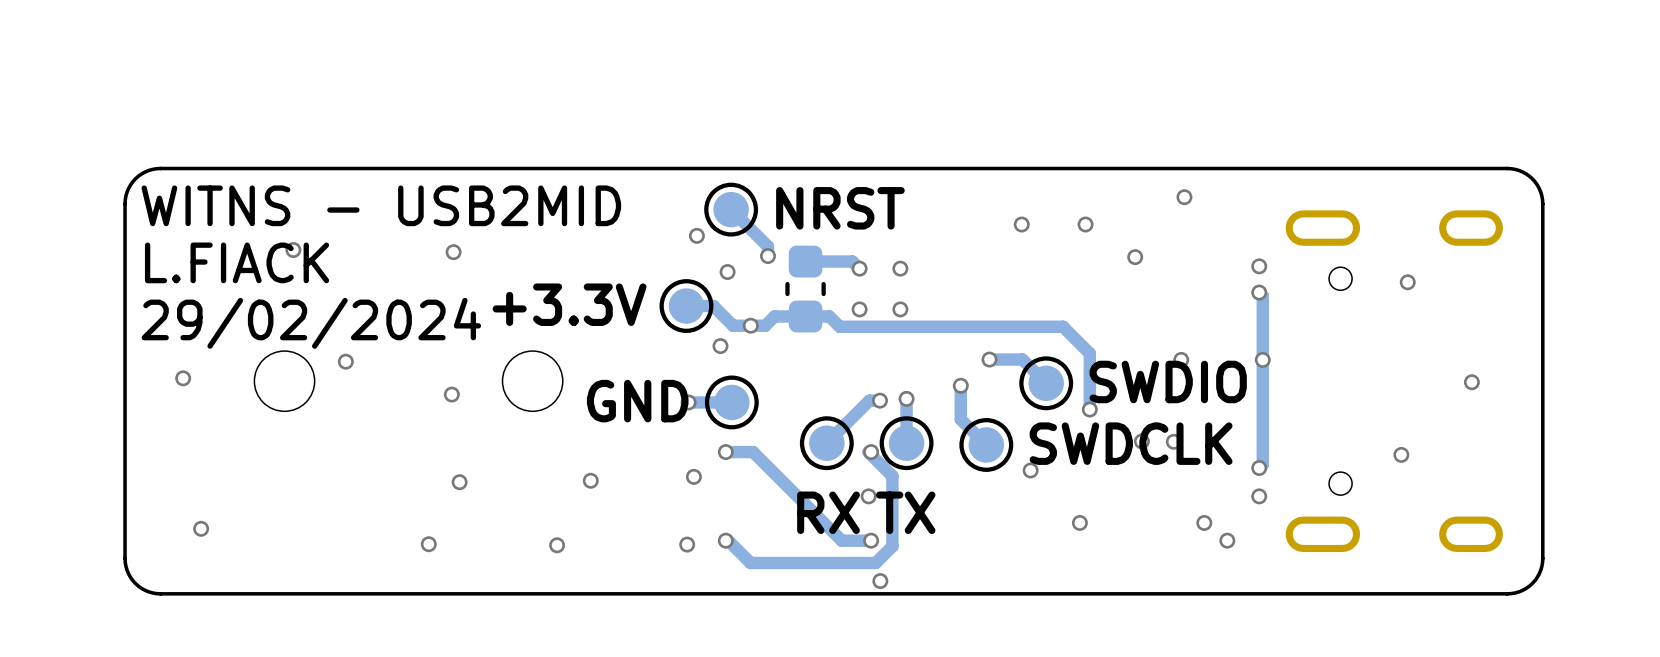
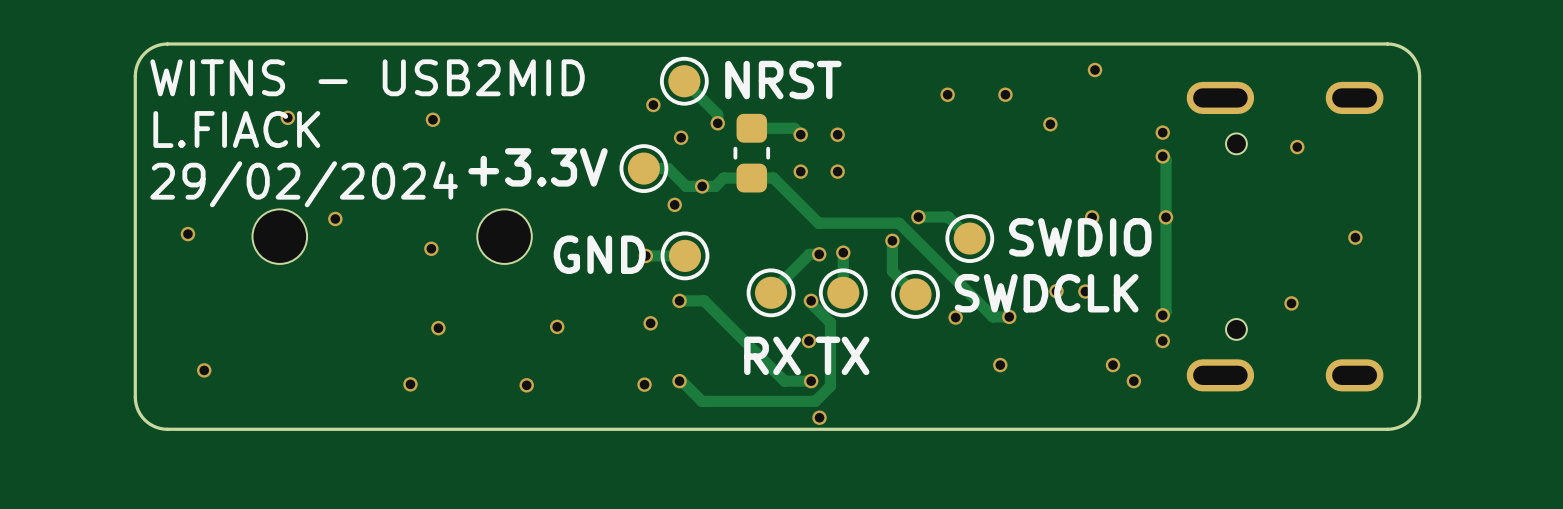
track: (839, 326) (1063, 326) (1089, 353) (1089, 409) -> (782, 187) (818, 223) (899, 223) (992, 316) (1009, 316)
via position: (1089, 409) -> (1009, 316)

